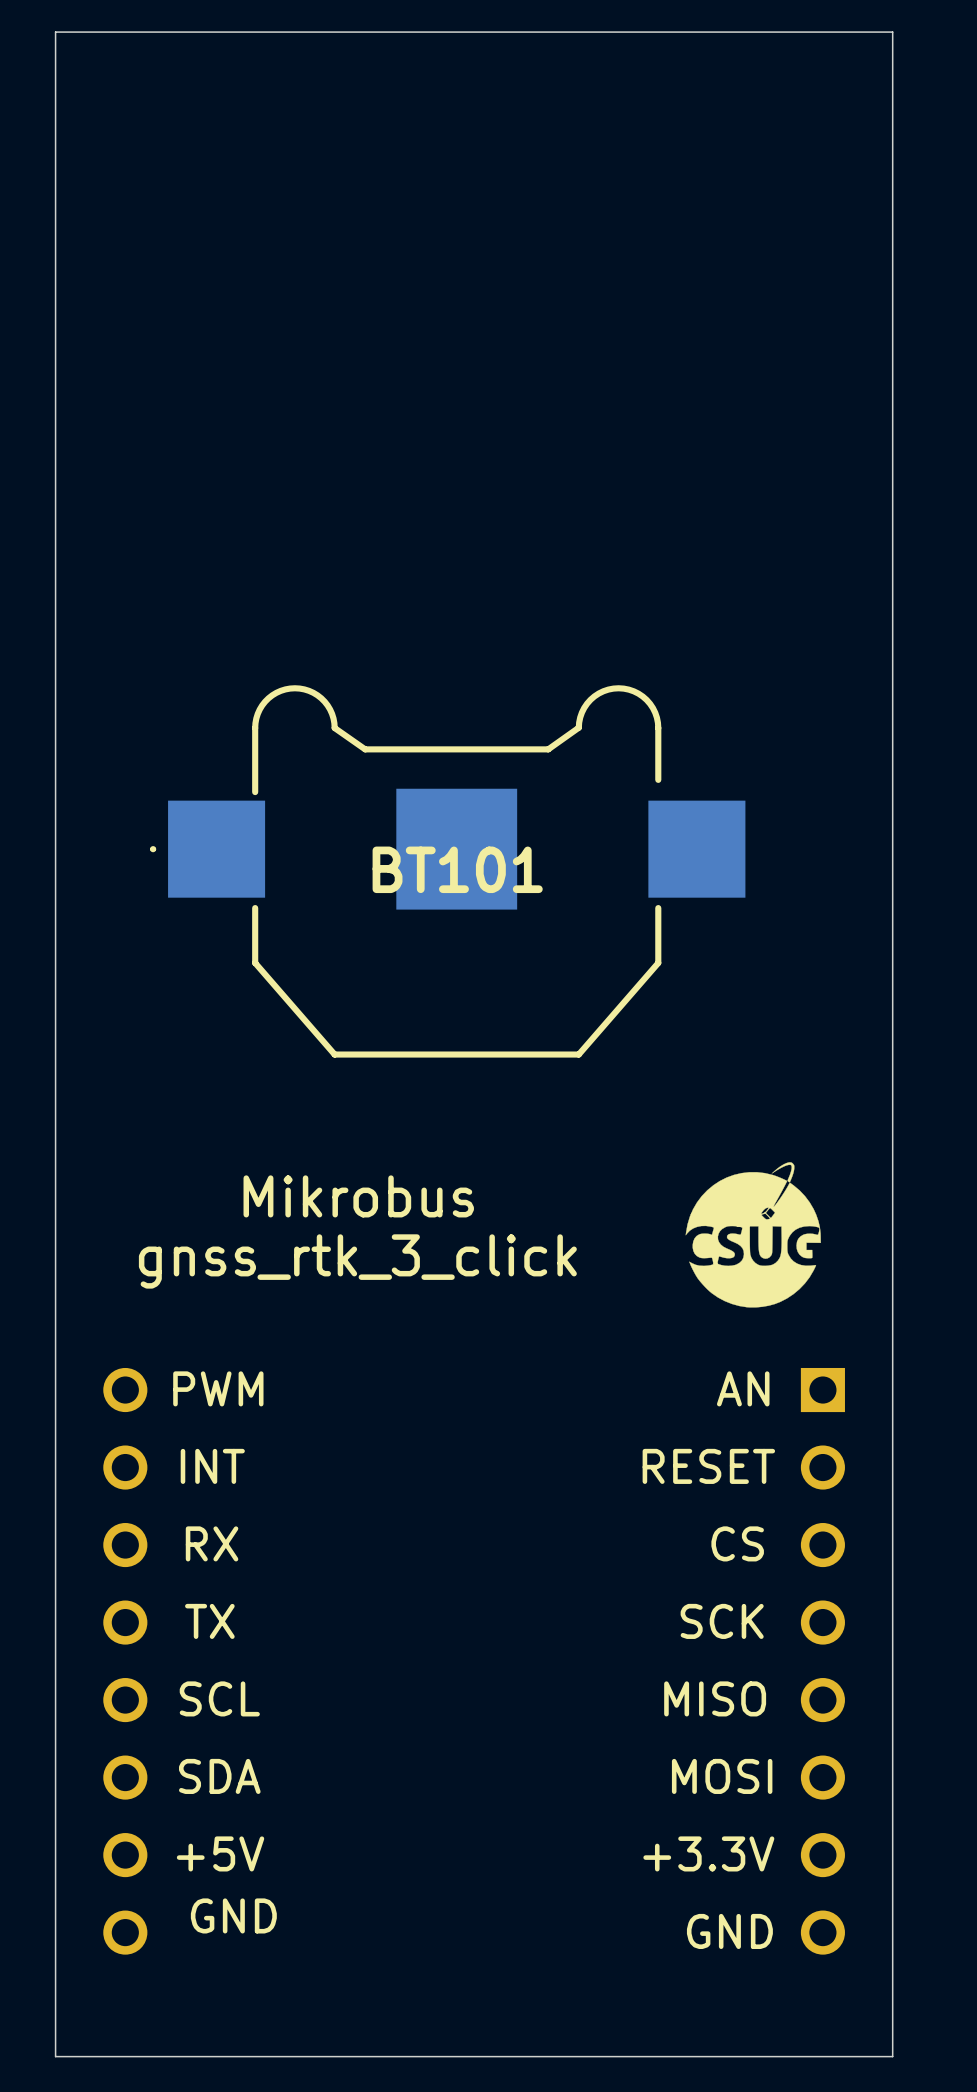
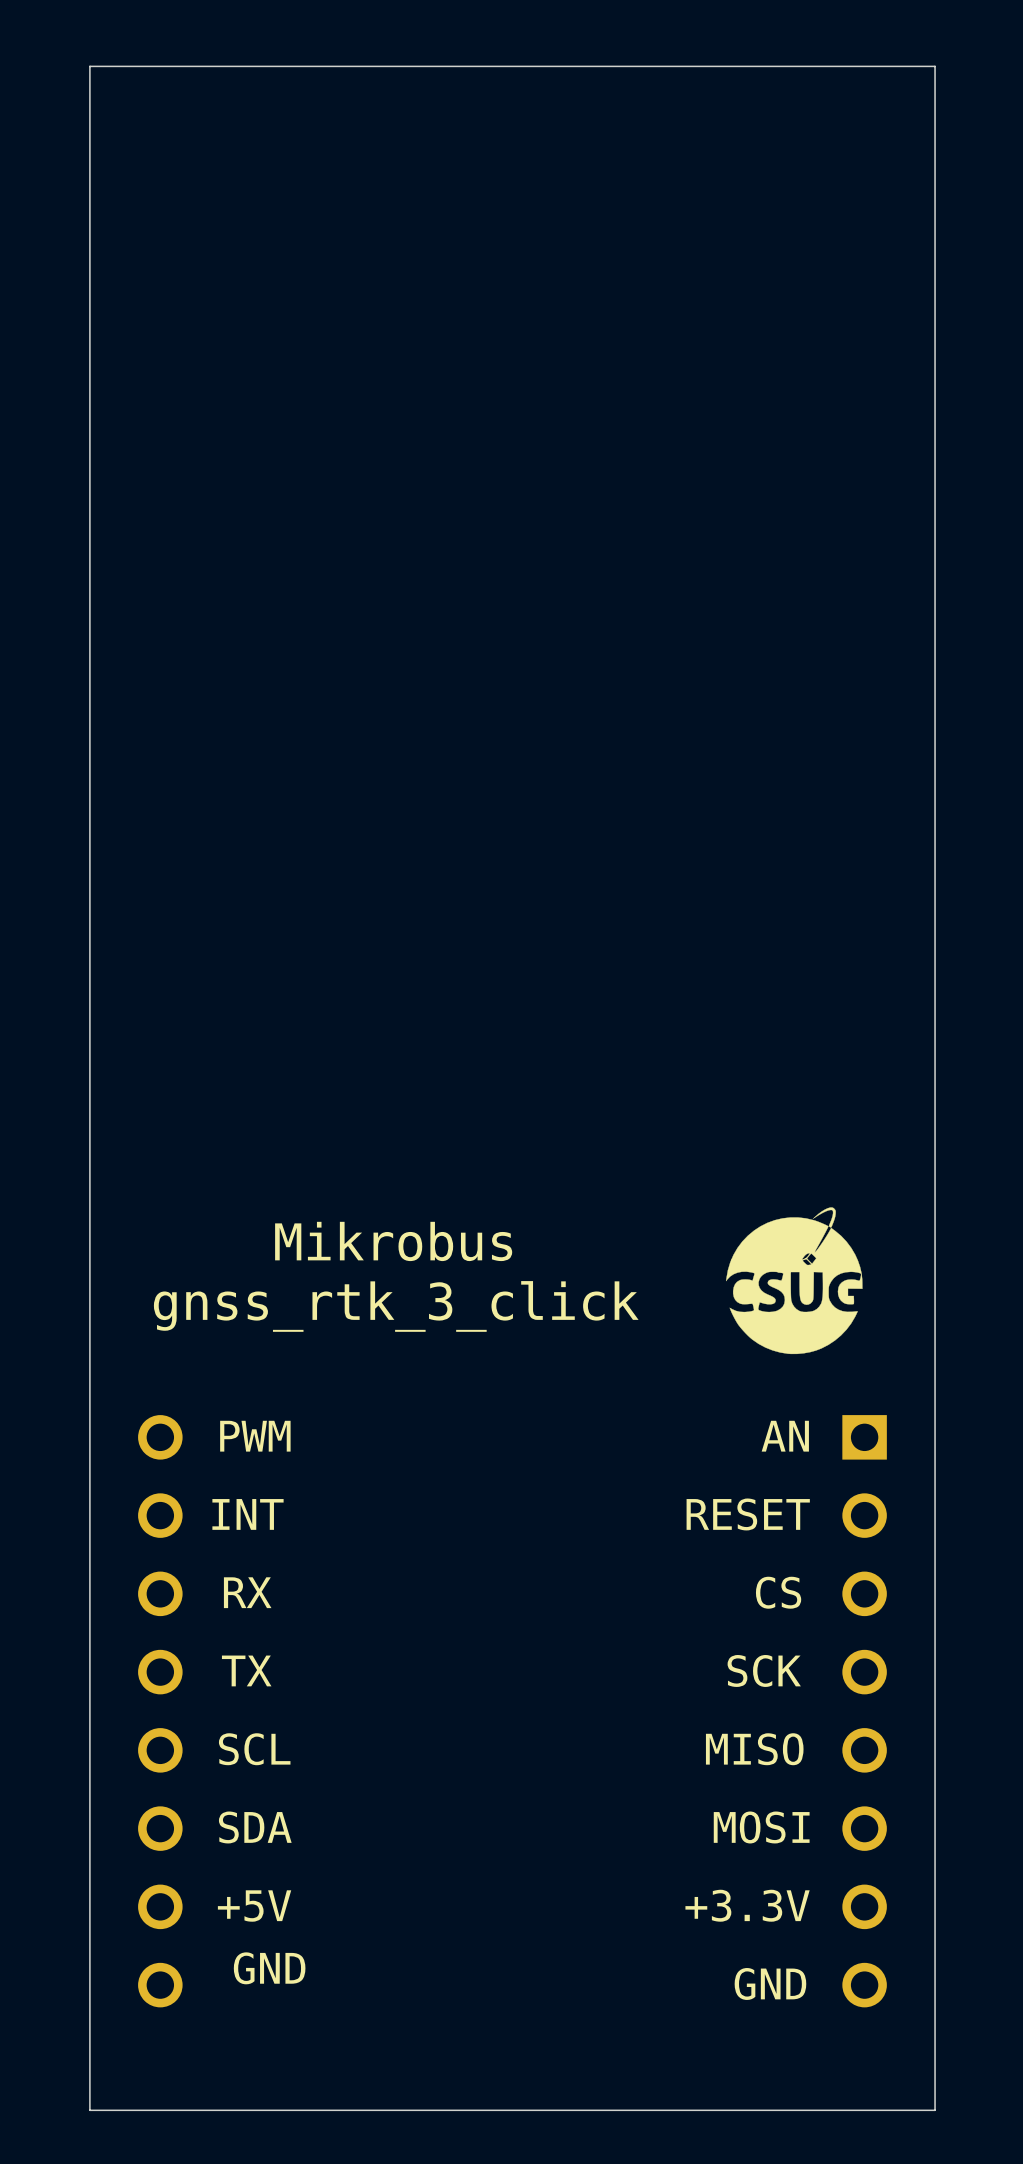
BT101: (447, 871) -> none

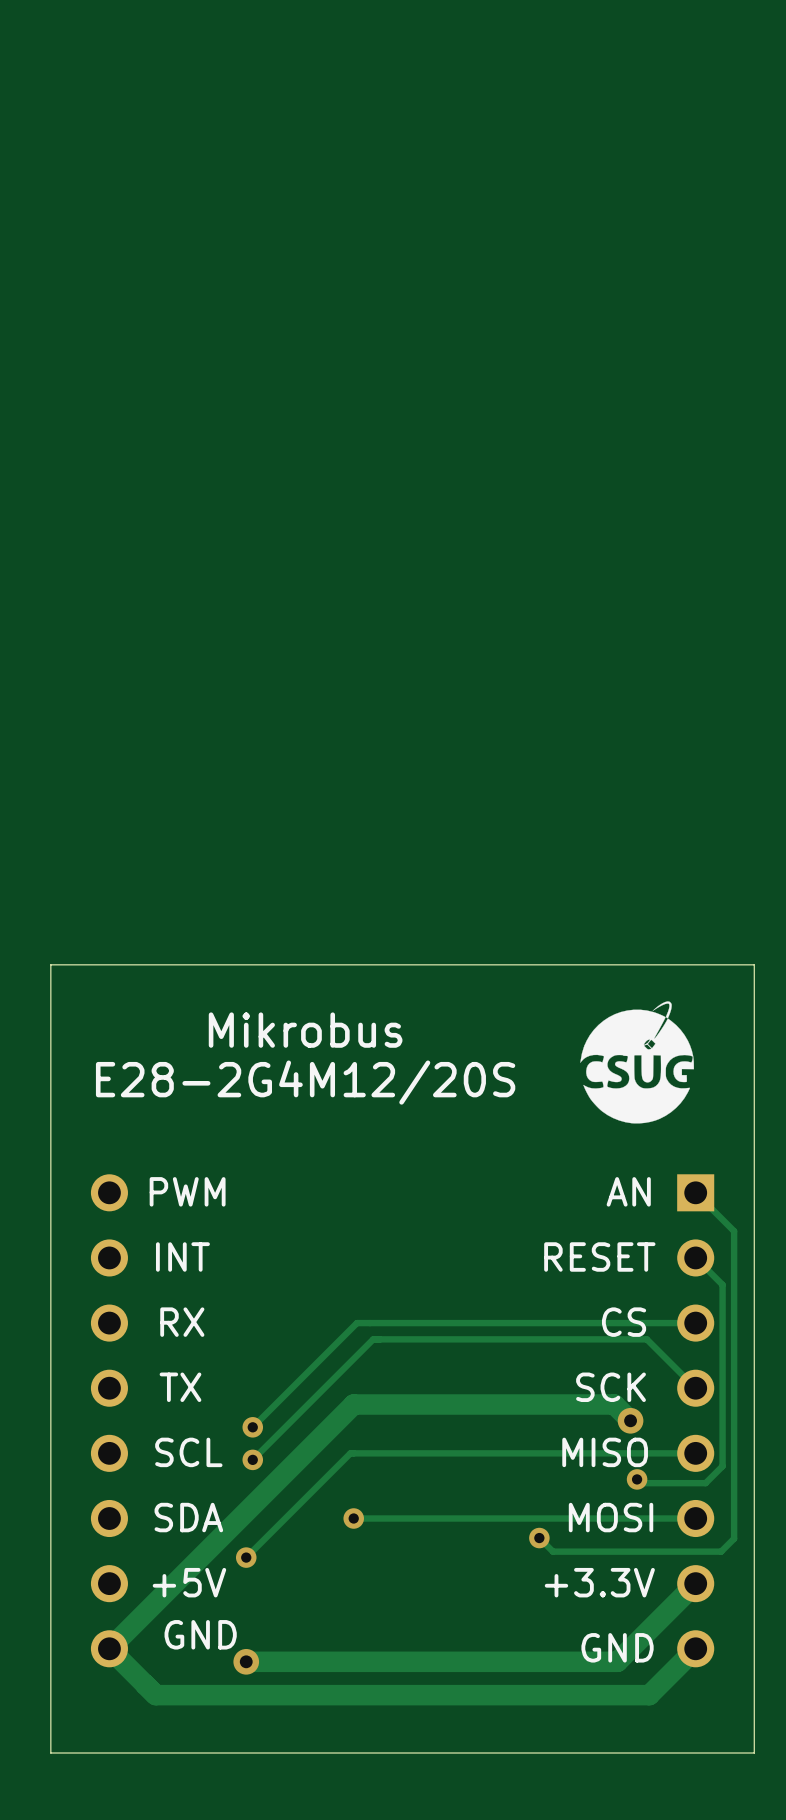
board edge: (935, 1163) (935, 66) (89, 66) (89, 1163) -> (754, 964) (50, 964)
text: gnss_rtk_3_click (396, 1306) -> E28-2G4M12/20S (305, 1082)
track: none -> (695, 1192) (734, 1231) (734, 1538) (721, 1551) (552, 1551) (539, 1538)
track: none -> (695, 1257) (722, 1284) (722, 1466) (705, 1483) (640, 1483) (637, 1479)
track: none -> (695, 1323) (356, 1323) (252, 1427)
track: none -> (695, 1388) (646, 1339) (373, 1339) (252, 1459)
track: none -> (630, 1420) (614, 1404) (353, 1404) (109, 1648) (155, 1695) (649, 1695) (695, 1648)
via: none -> (630, 1420)
via: none -> (252, 1427)
track: none -> (695, 1453) (350, 1453) (246, 1557)
via: none -> (252, 1459)
via: none -> (637, 1479)
via: none -> (353, 1518)
track: none -> (695, 1518) (353, 1518)
via: none -> (539, 1538)
via: none -> (246, 1557)
track: none -> (695, 1583) (617, 1661) (246, 1661)
via: none -> (246, 1661)

